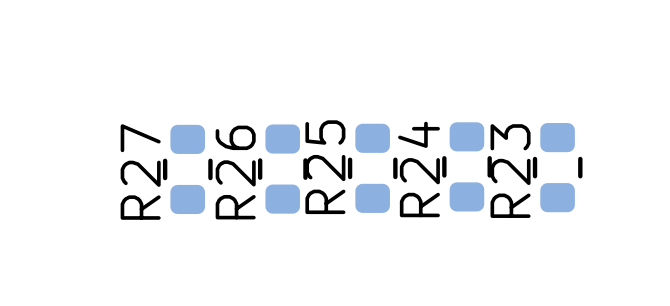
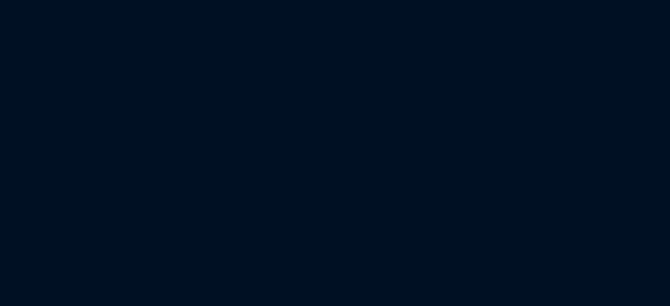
R24: (467, 166) -> none
R23: (557, 167) -> none
R25: (372, 168) -> none
R27: (187, 169) -> none
R26: (282, 169) -> none

